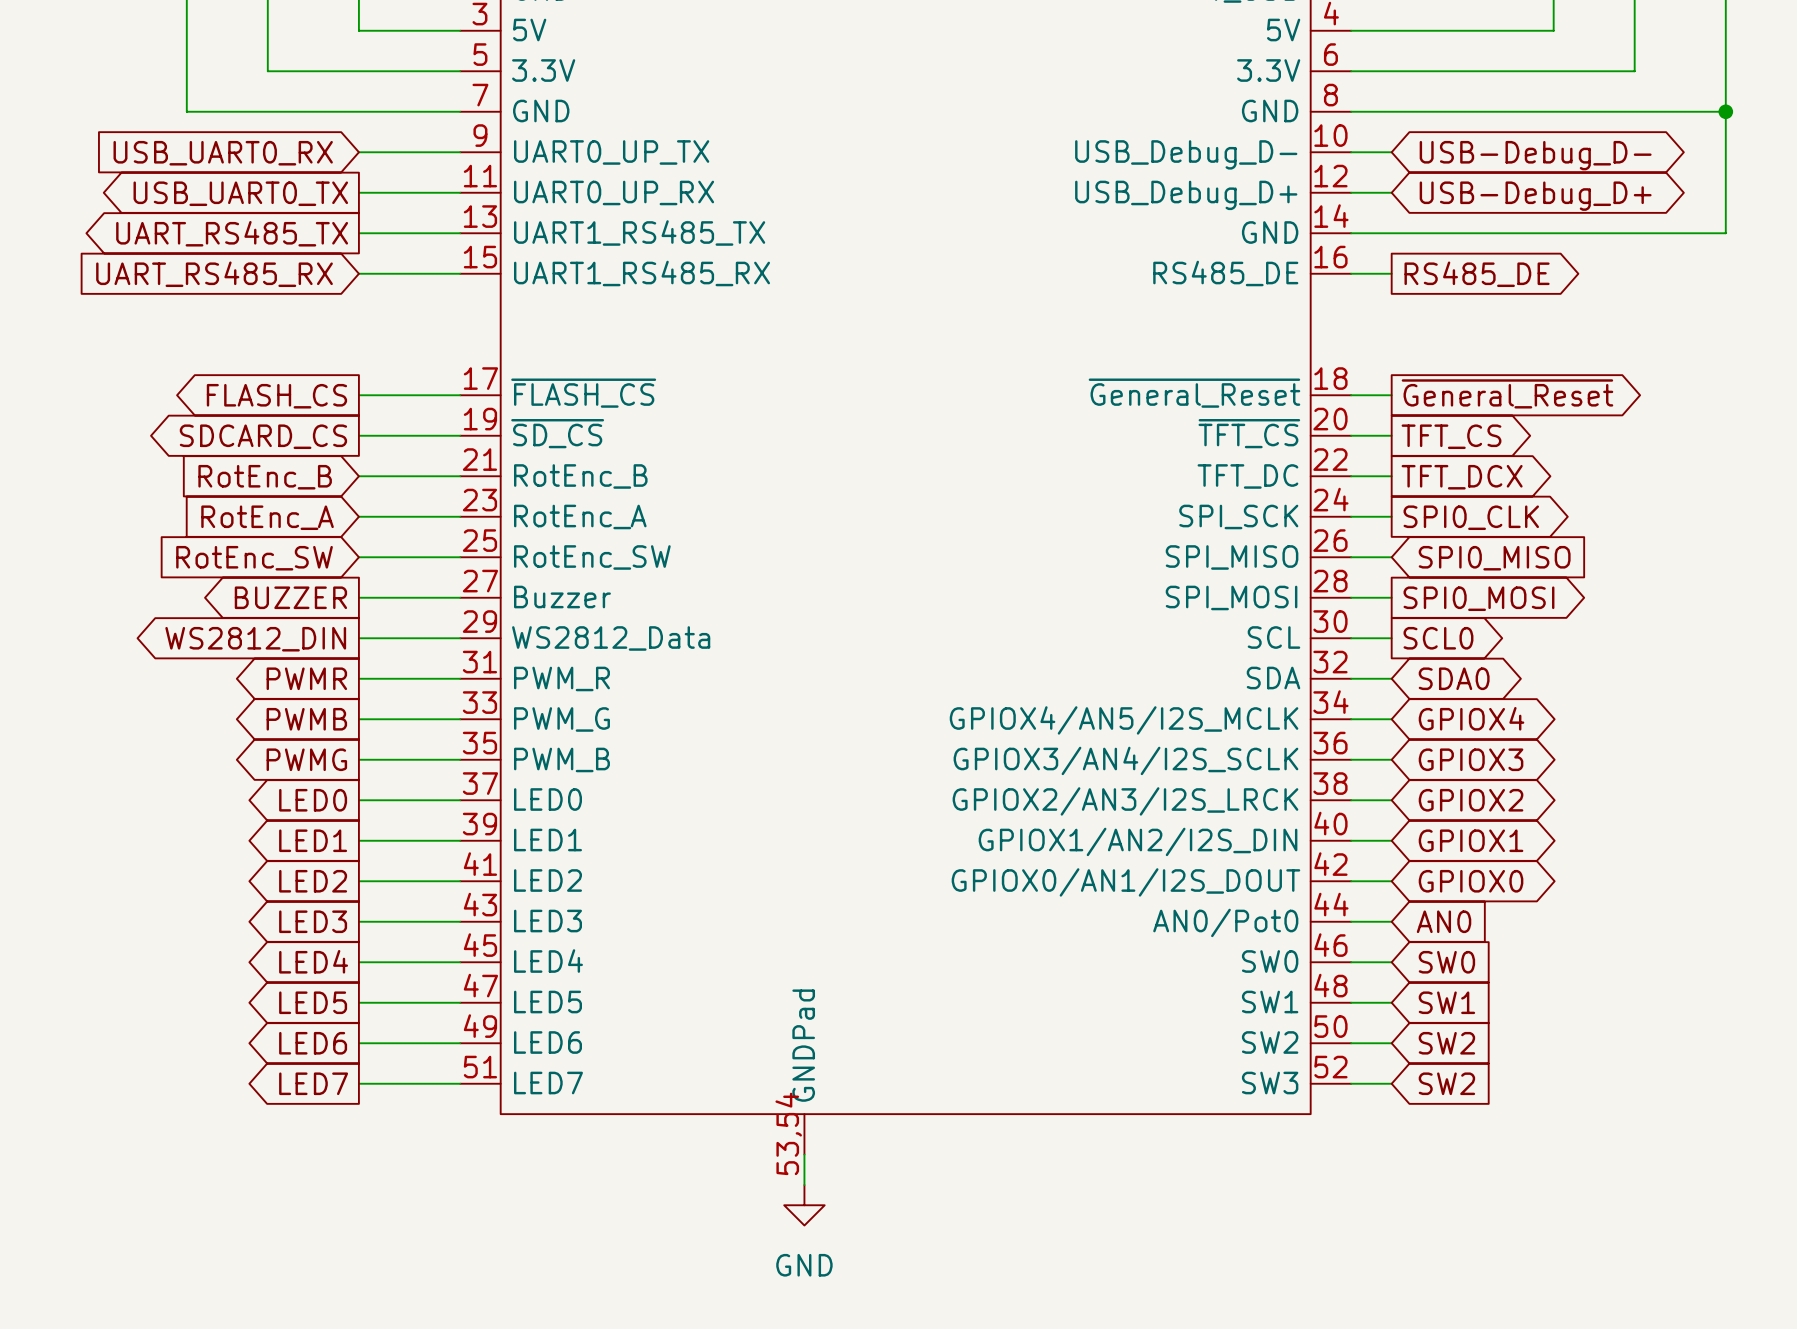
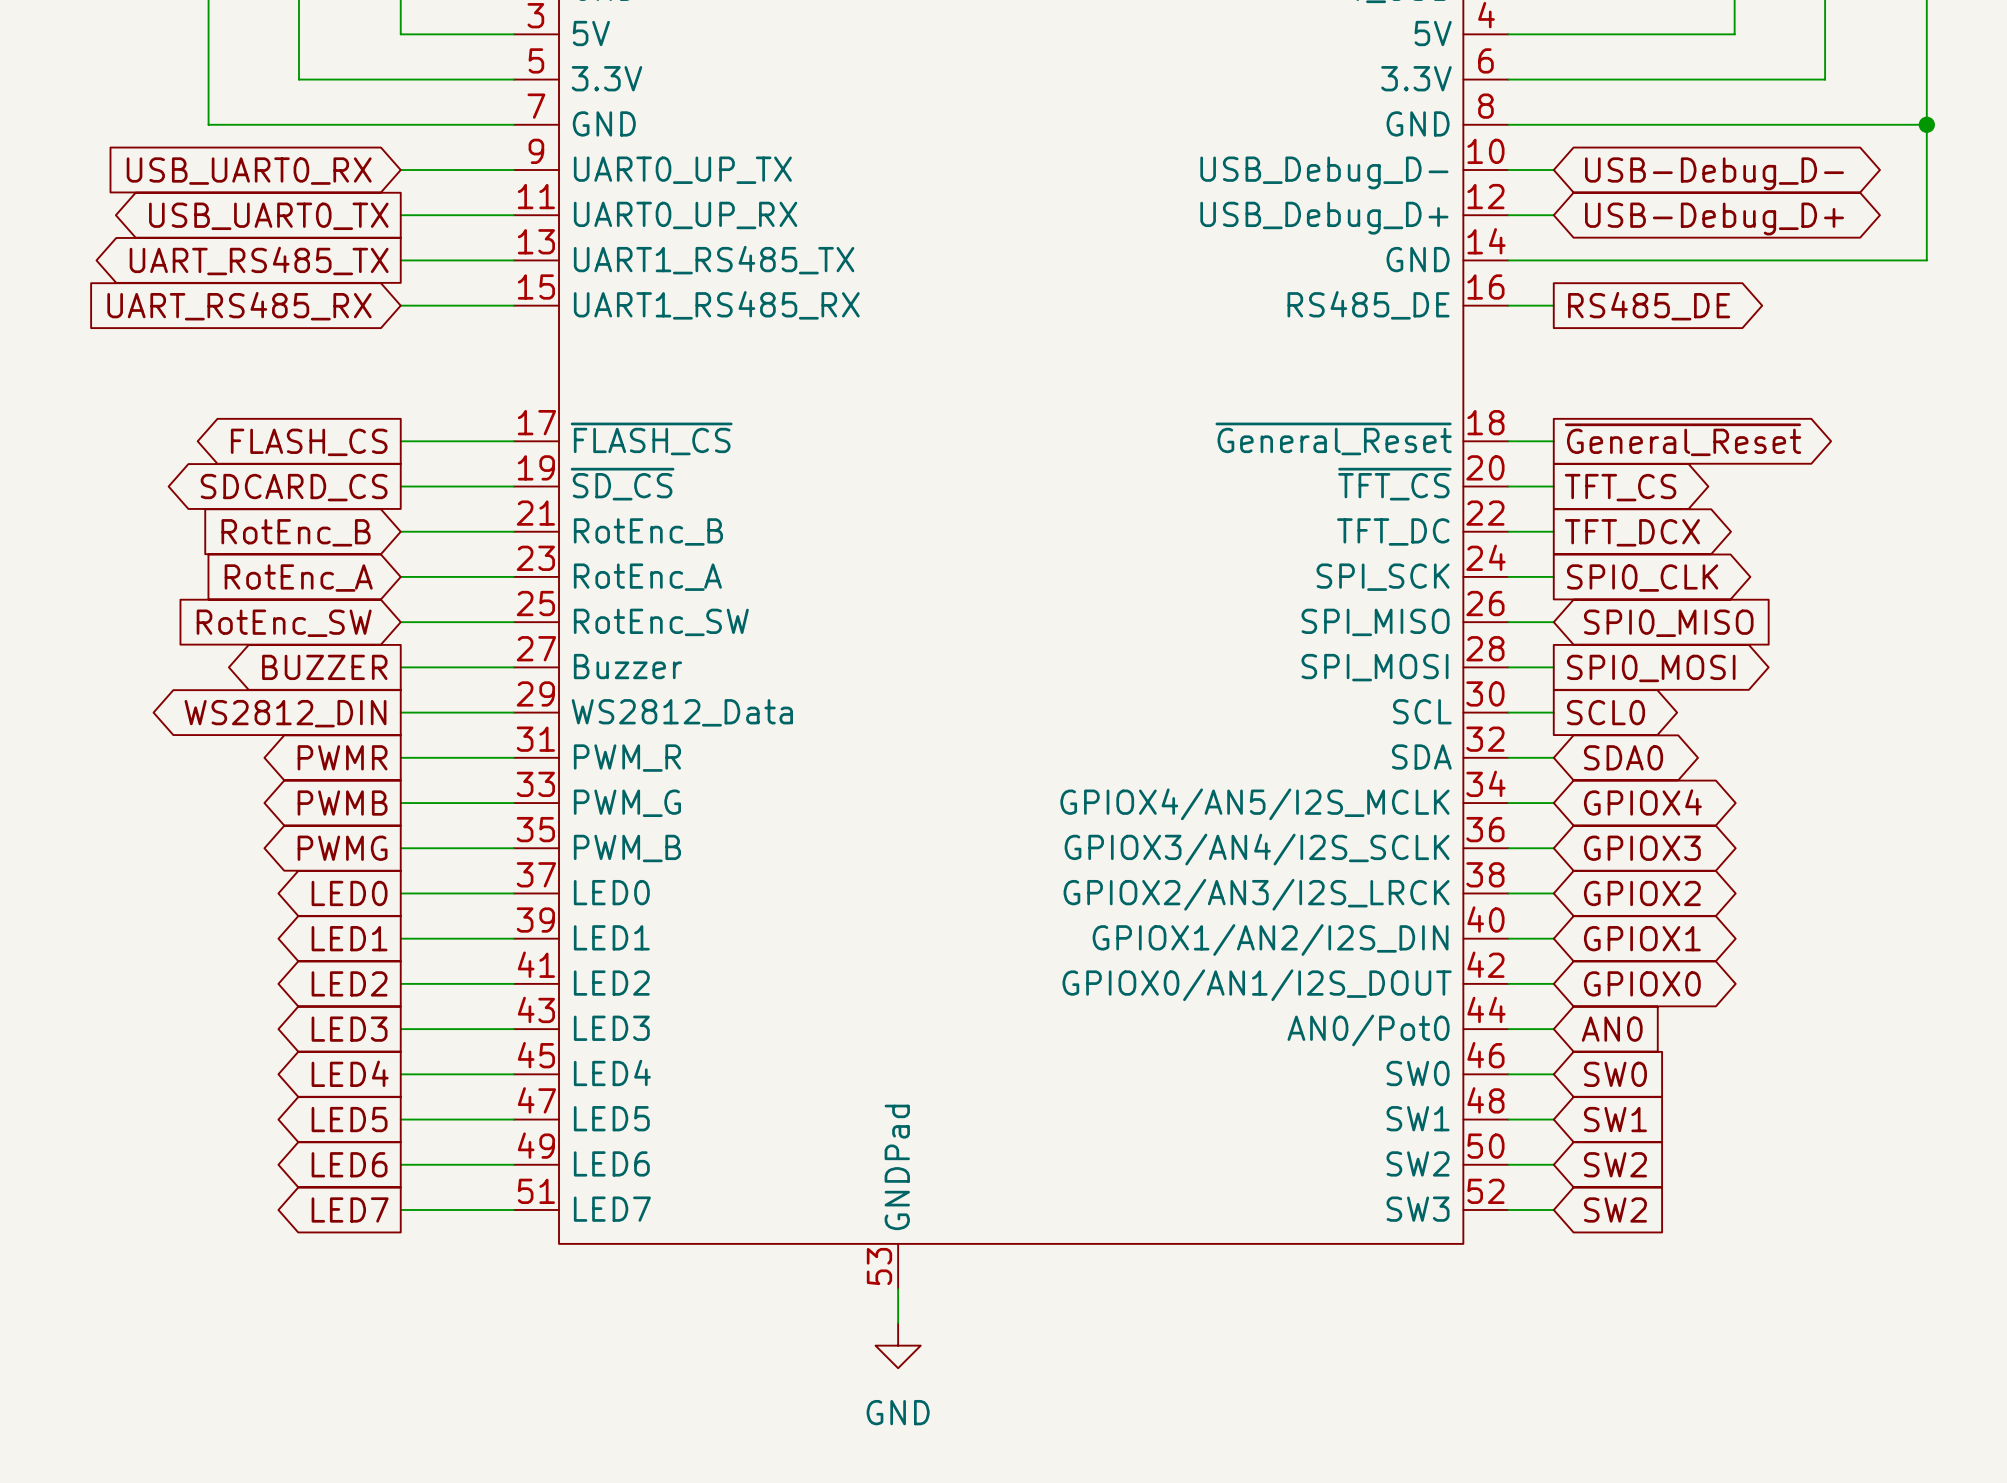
part pin number: 53,54 (788, 1133) -> 53 (879, 1266)

